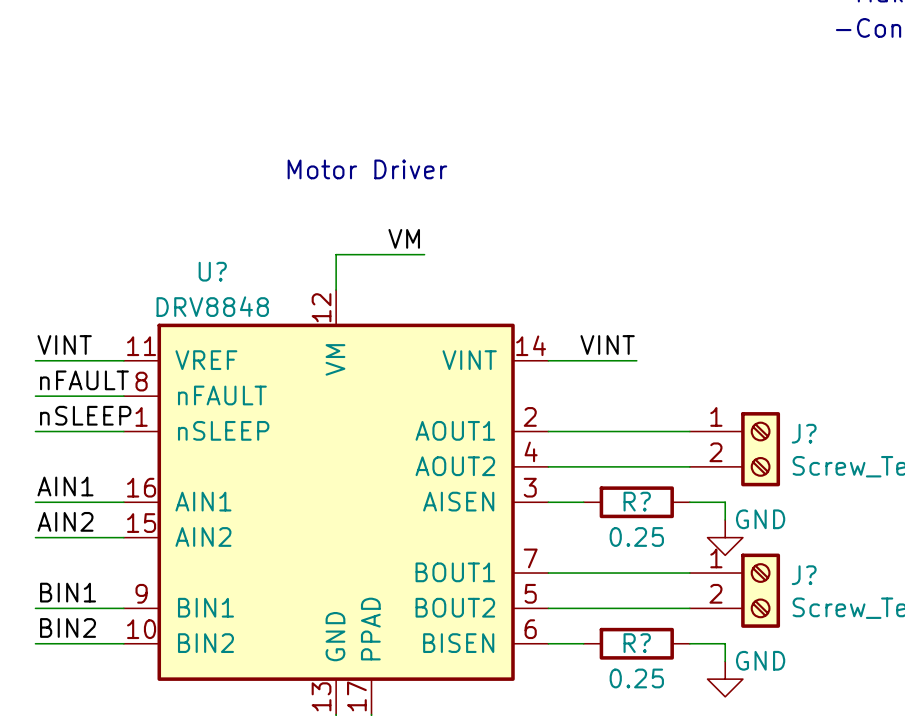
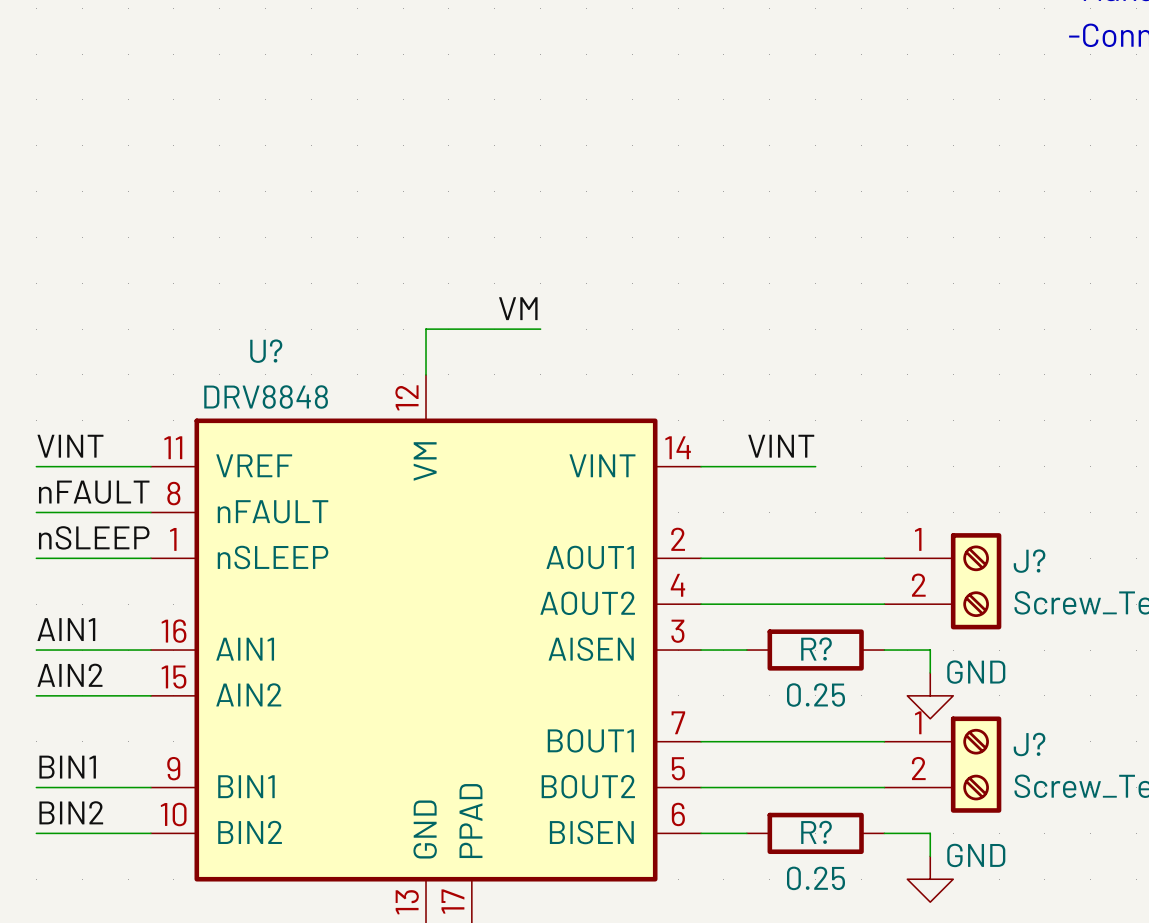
text: Motor Driver (367, 169) -> none

